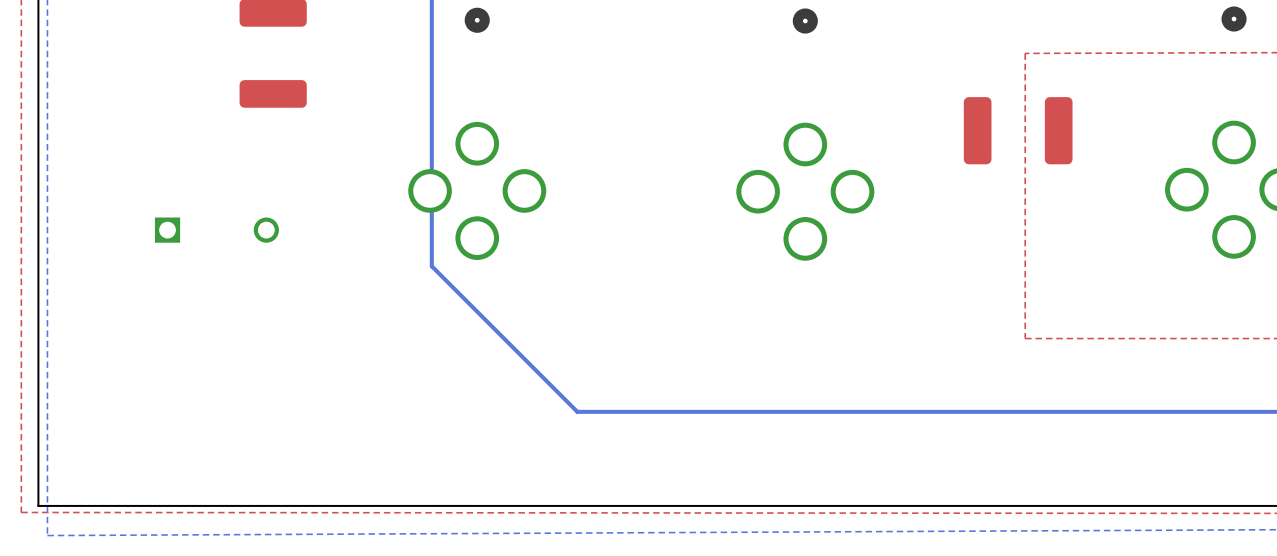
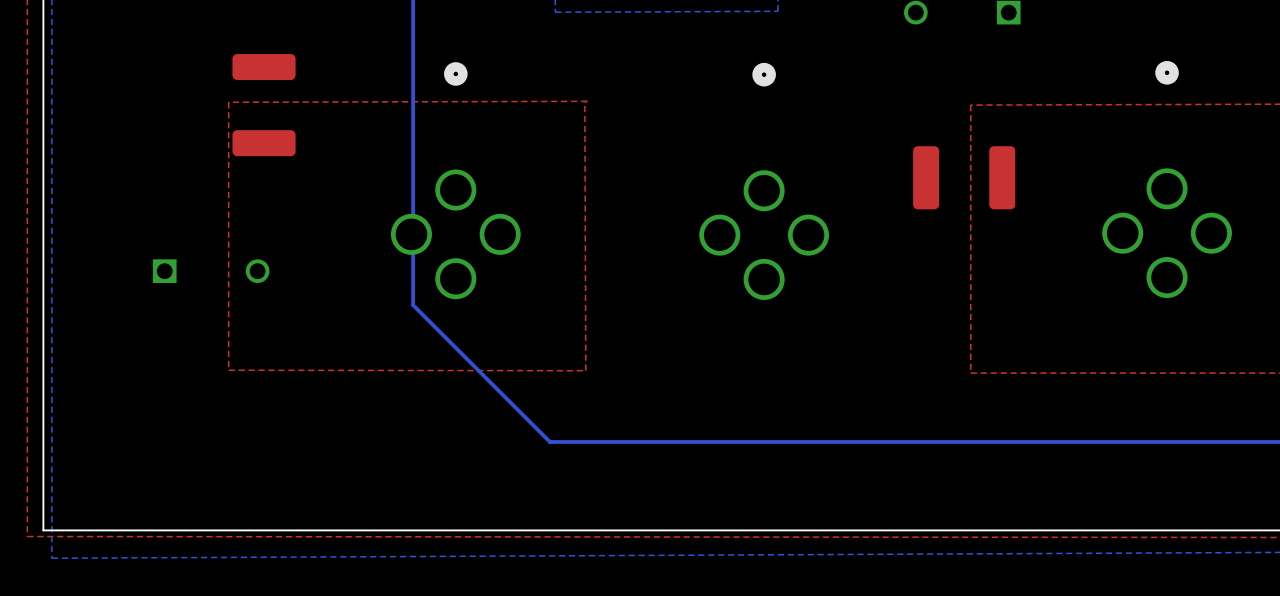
top zone outline: none -> (587, 101) (228, 102) (228, 370) (585, 370) (584, 101) (587, 101)

